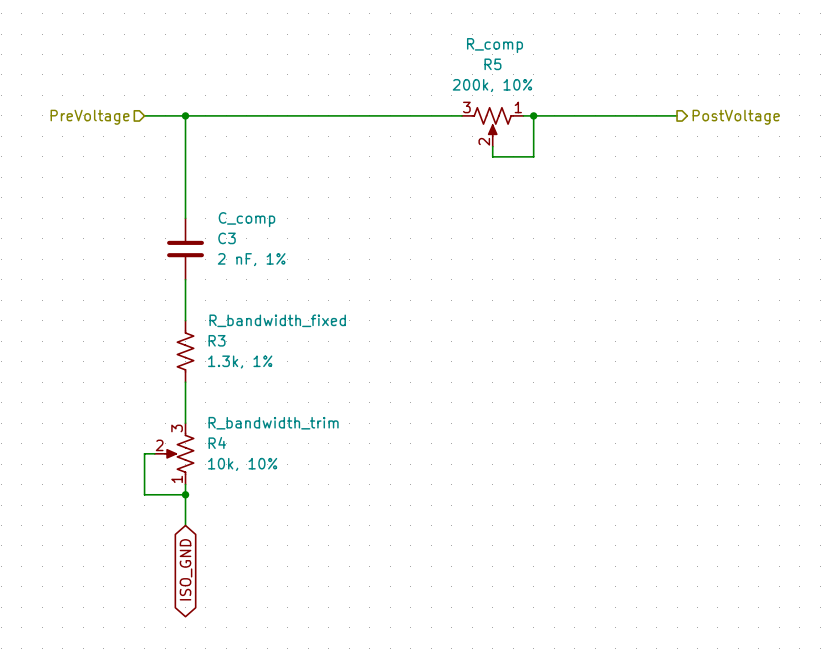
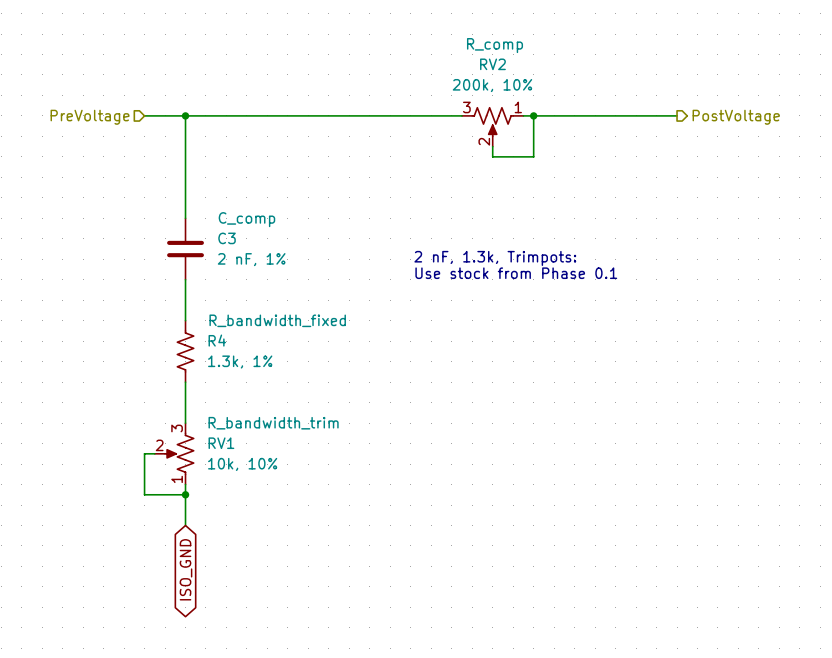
R5 name: R5 (492, 64) -> RV2 (492, 64)
text: none -> 2 nF, 1.3k, Trimpots: (495, 258)
text: none -> Use stock from Phase 0.1 (516, 273)
R3 name: R3 (217, 340) -> R4 (217, 340)
R4 name: R4 (217, 442) -> RV1 (221, 443)

